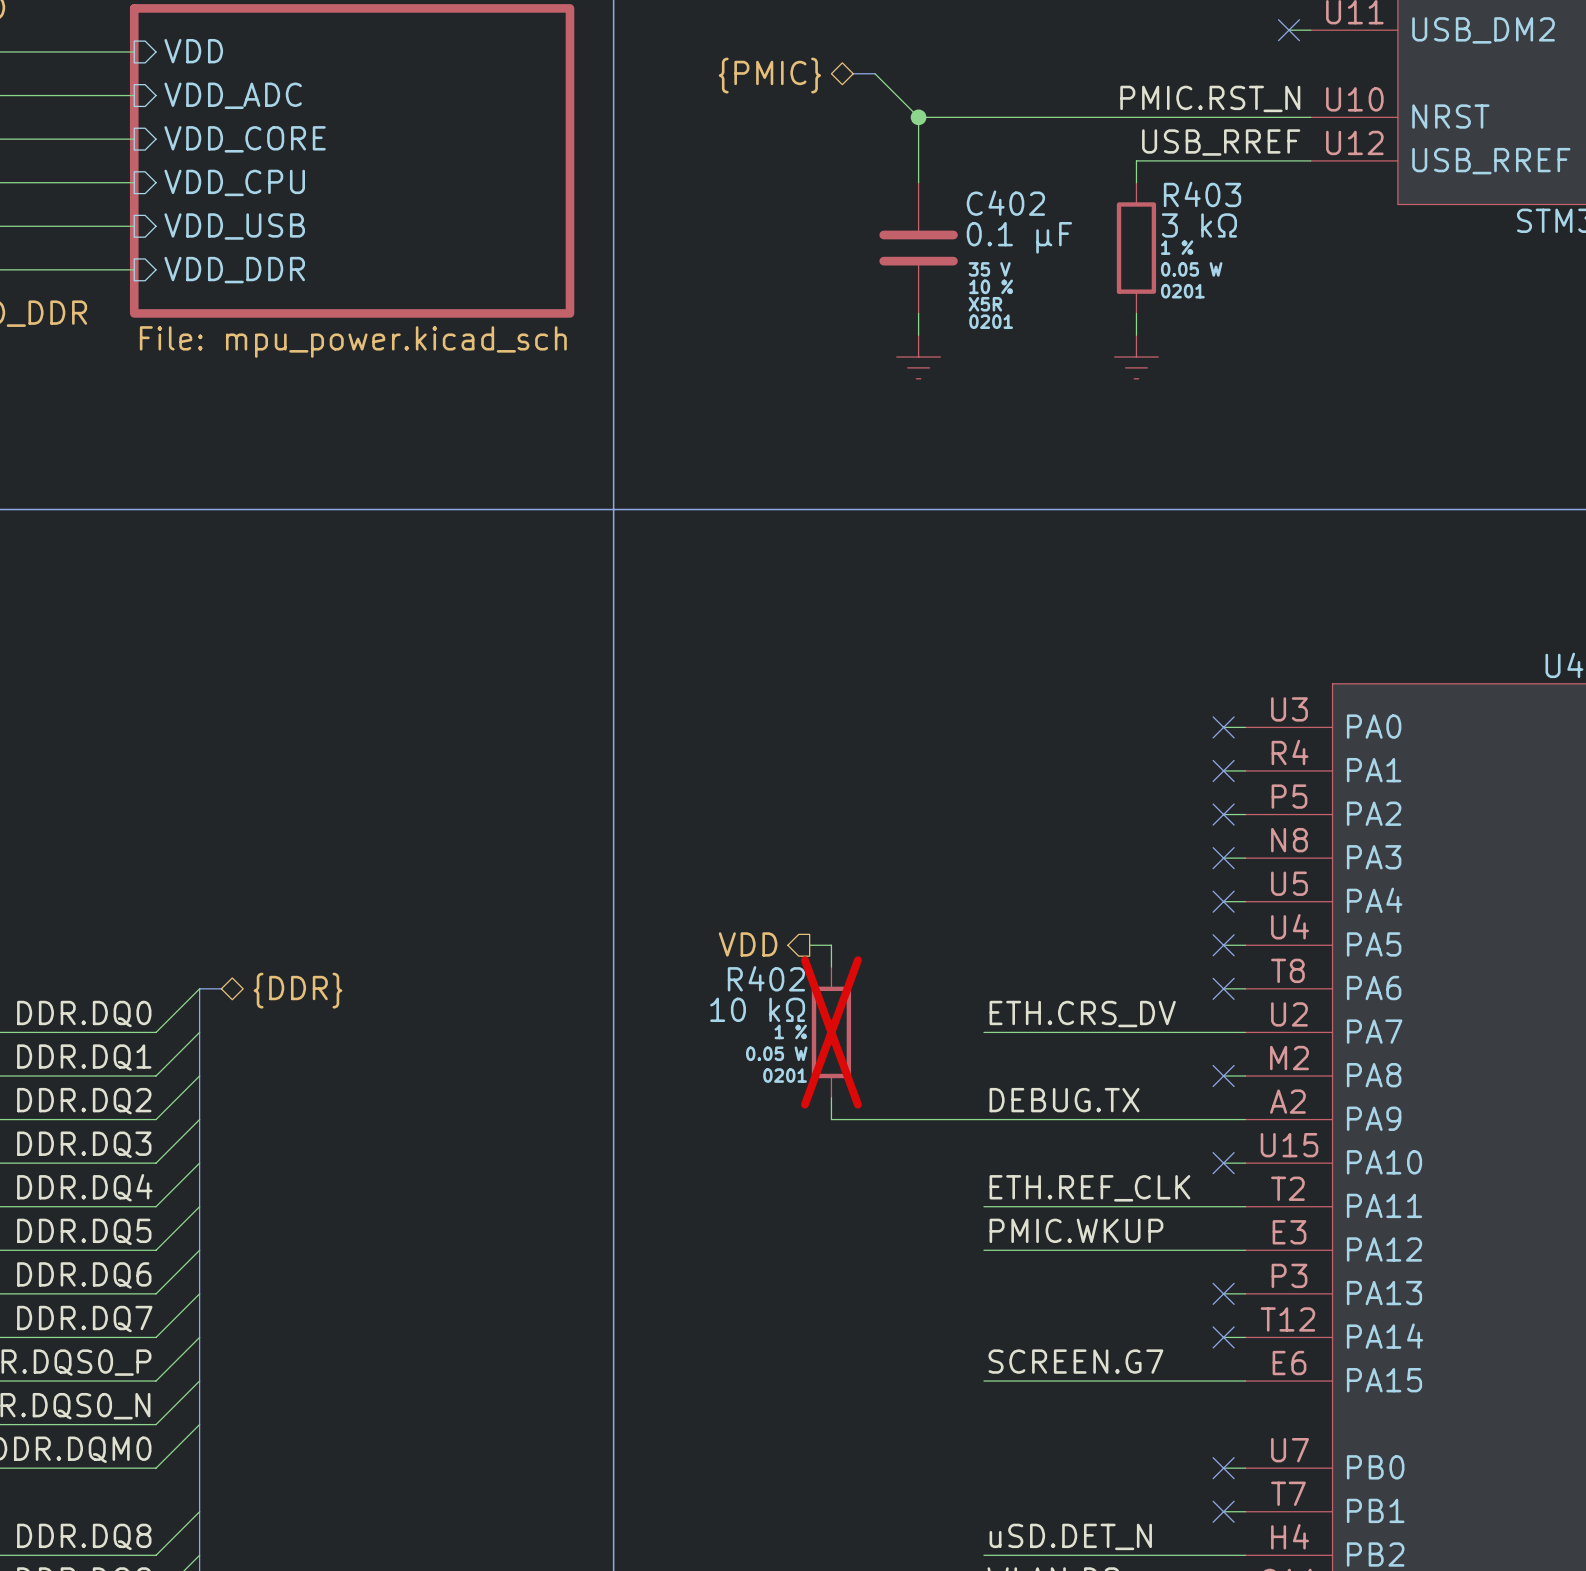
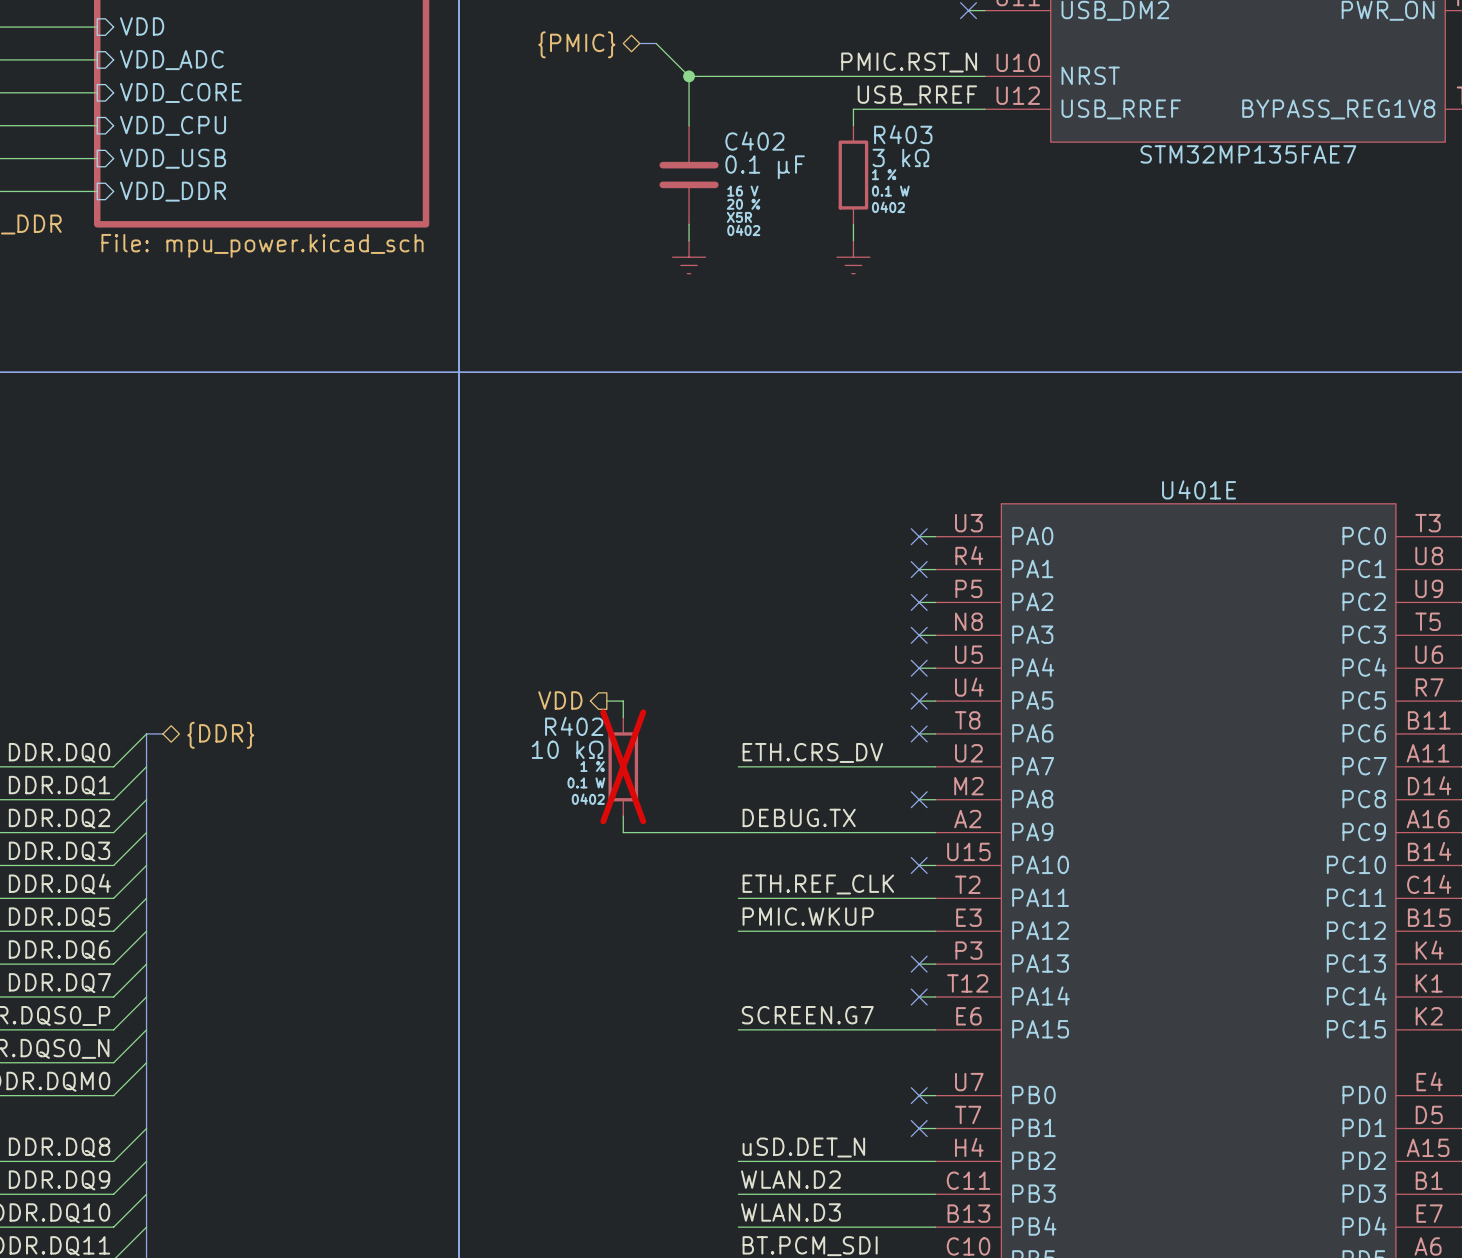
C402 text: 35 V (989, 269) -> 16 V (742, 191)
R403 text: 0.05 W (1191, 269) -> 0.1 W (890, 191)
C402 text: 10 % (991, 286) -> 20 % (743, 204)
R403 text: 0201 (1182, 291) -> 0402 (888, 207)
C402 text: 0201 (991, 321) -> 0402 (743, 230)
R402 text: 0.05 W (776, 1053) -> 0.1 W (586, 782)
R402 text: 0201 (785, 1075) -> 0402 (588, 799)

